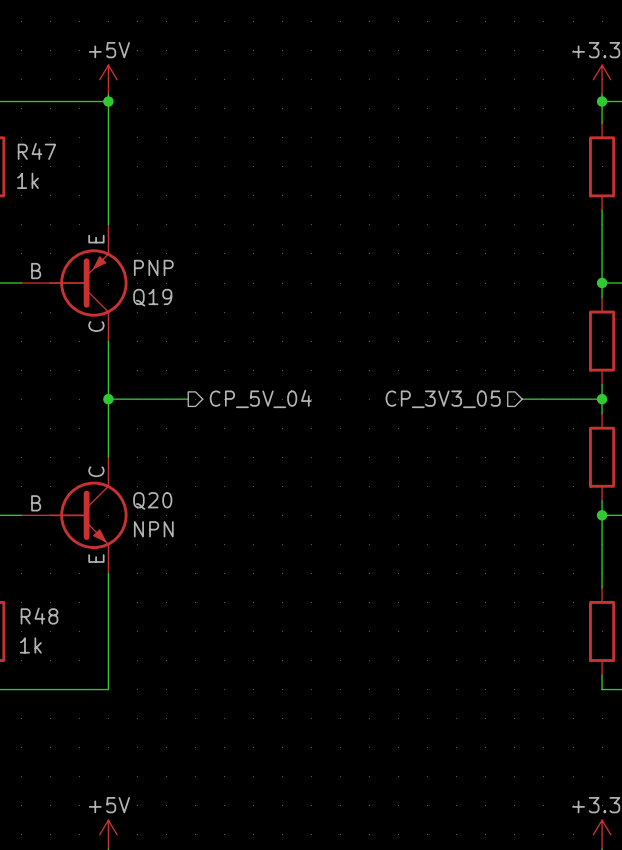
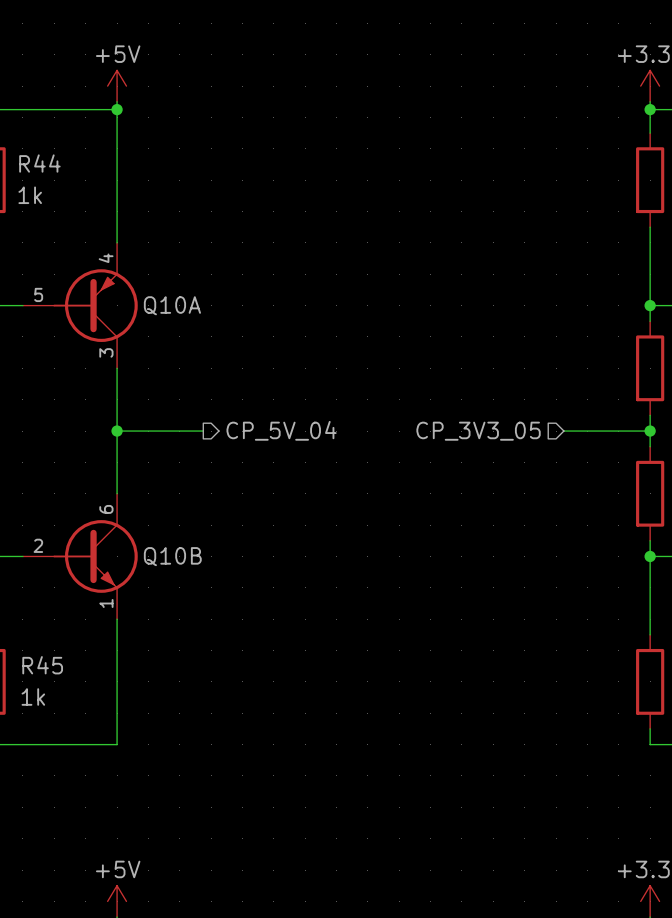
R47 name: R47 (36, 151) -> R44 (39, 163)
Q19: PNP (74, 283) -> none
Q10A: none -> (80, 305)
Q20 pin name: C (96, 471) -> none
Q20 pin number: none -> 6 (106, 509)
Q20 name: Q20 (152, 500) -> Q10B (172, 556)
Q20 pin name: B (36, 503) -> none
Q20 pin number: none -> 2 (38, 545)
Q20 value: NPN (153, 529) -> none
Q20 pin name: E (96, 558) -> none
Q20 pin number: none -> 1 (106, 603)
R48 name: R48 (39, 616) -> R45 (42, 665)

